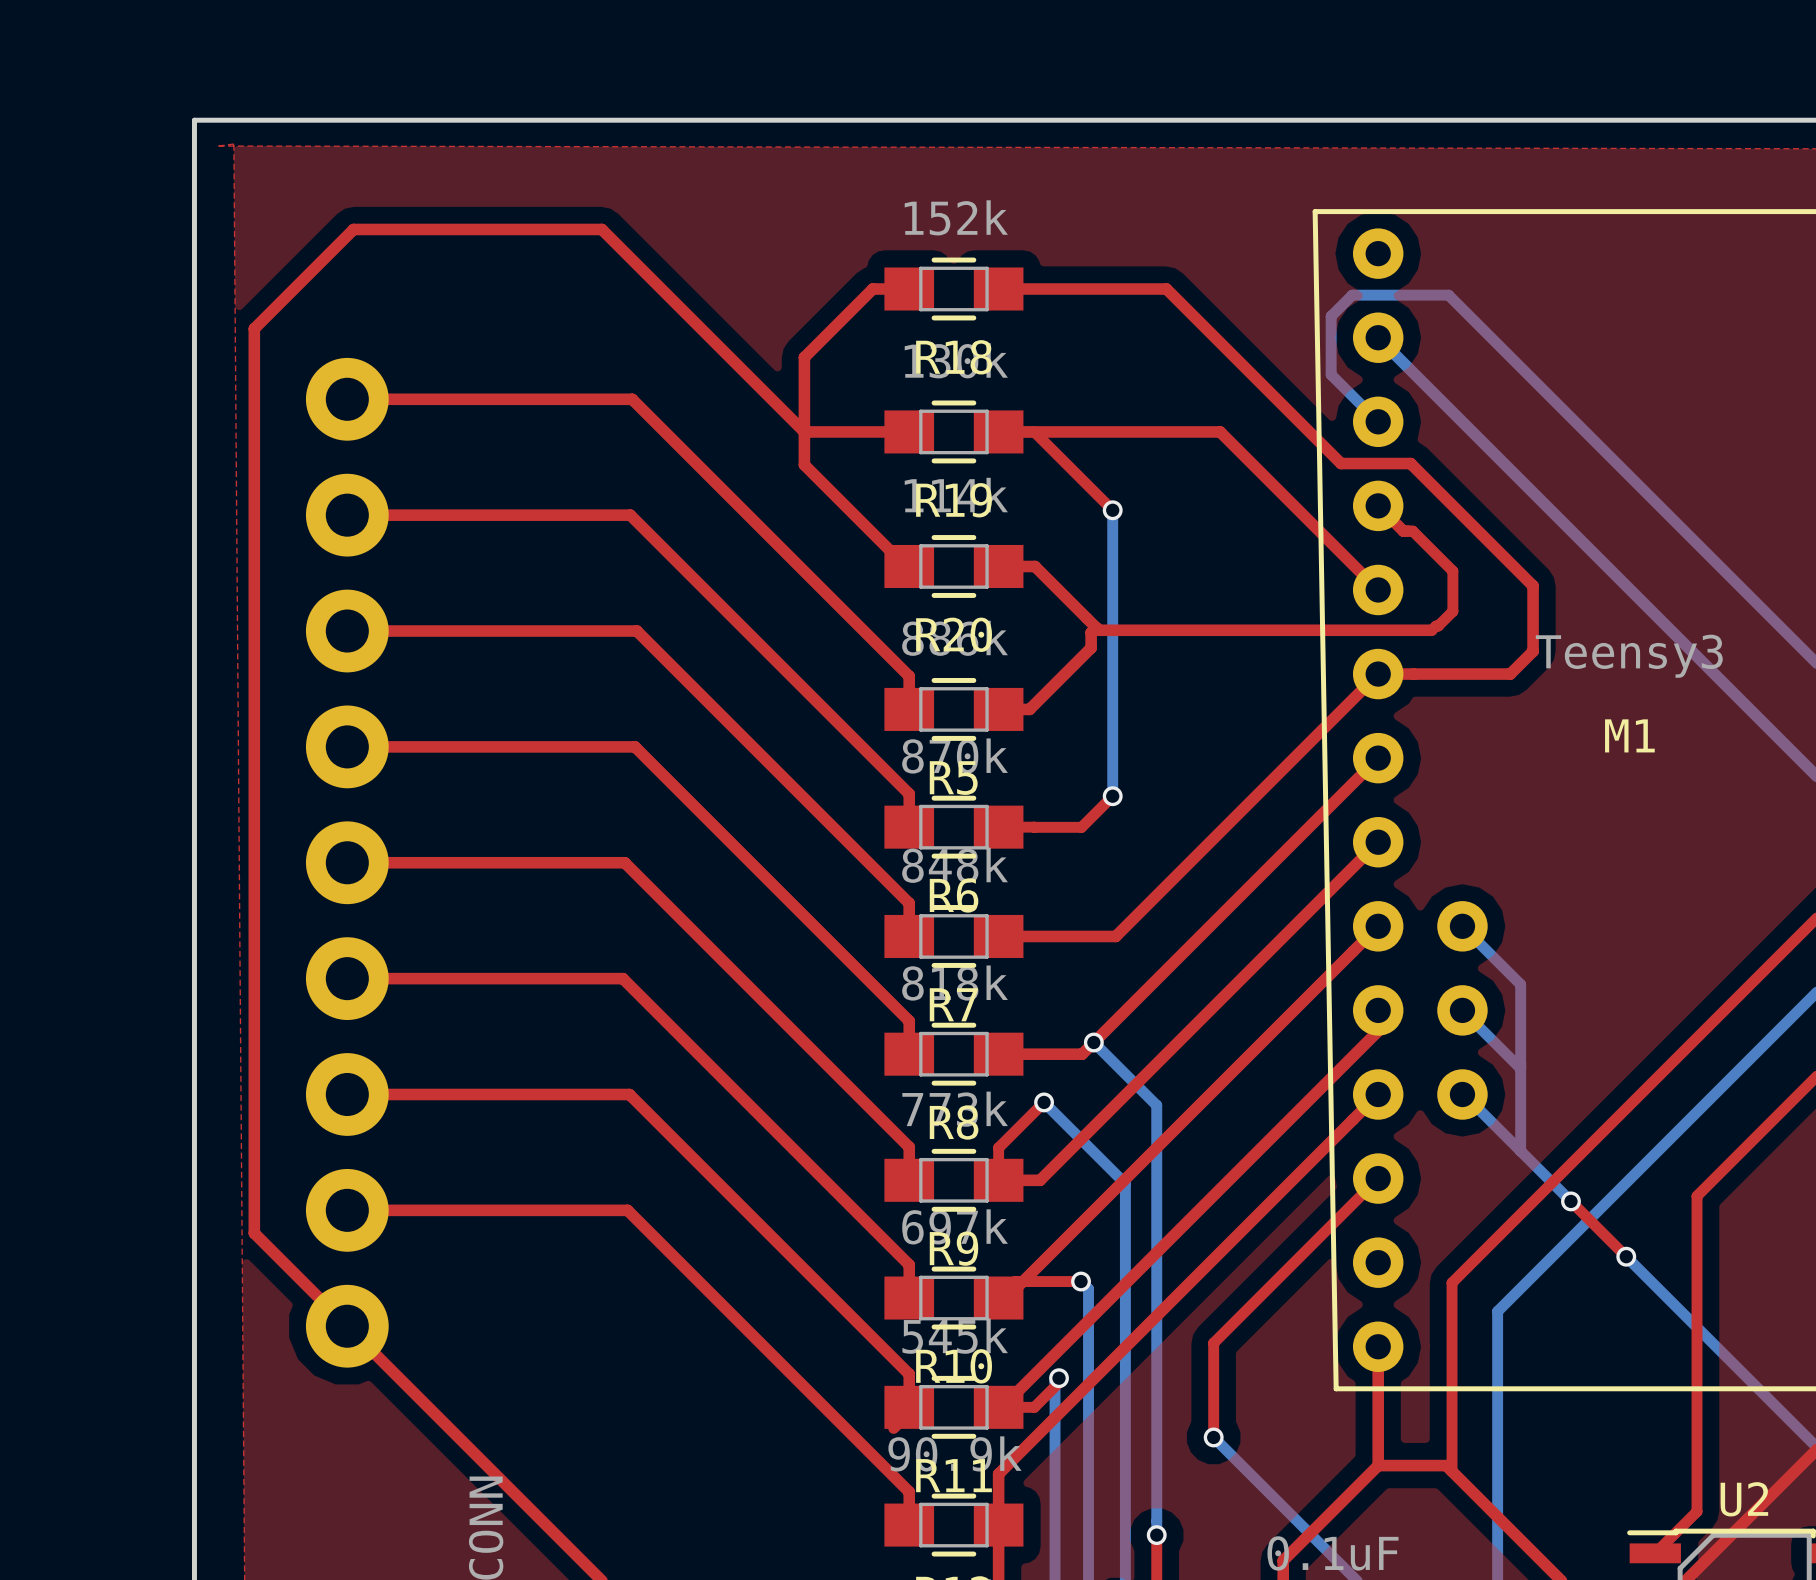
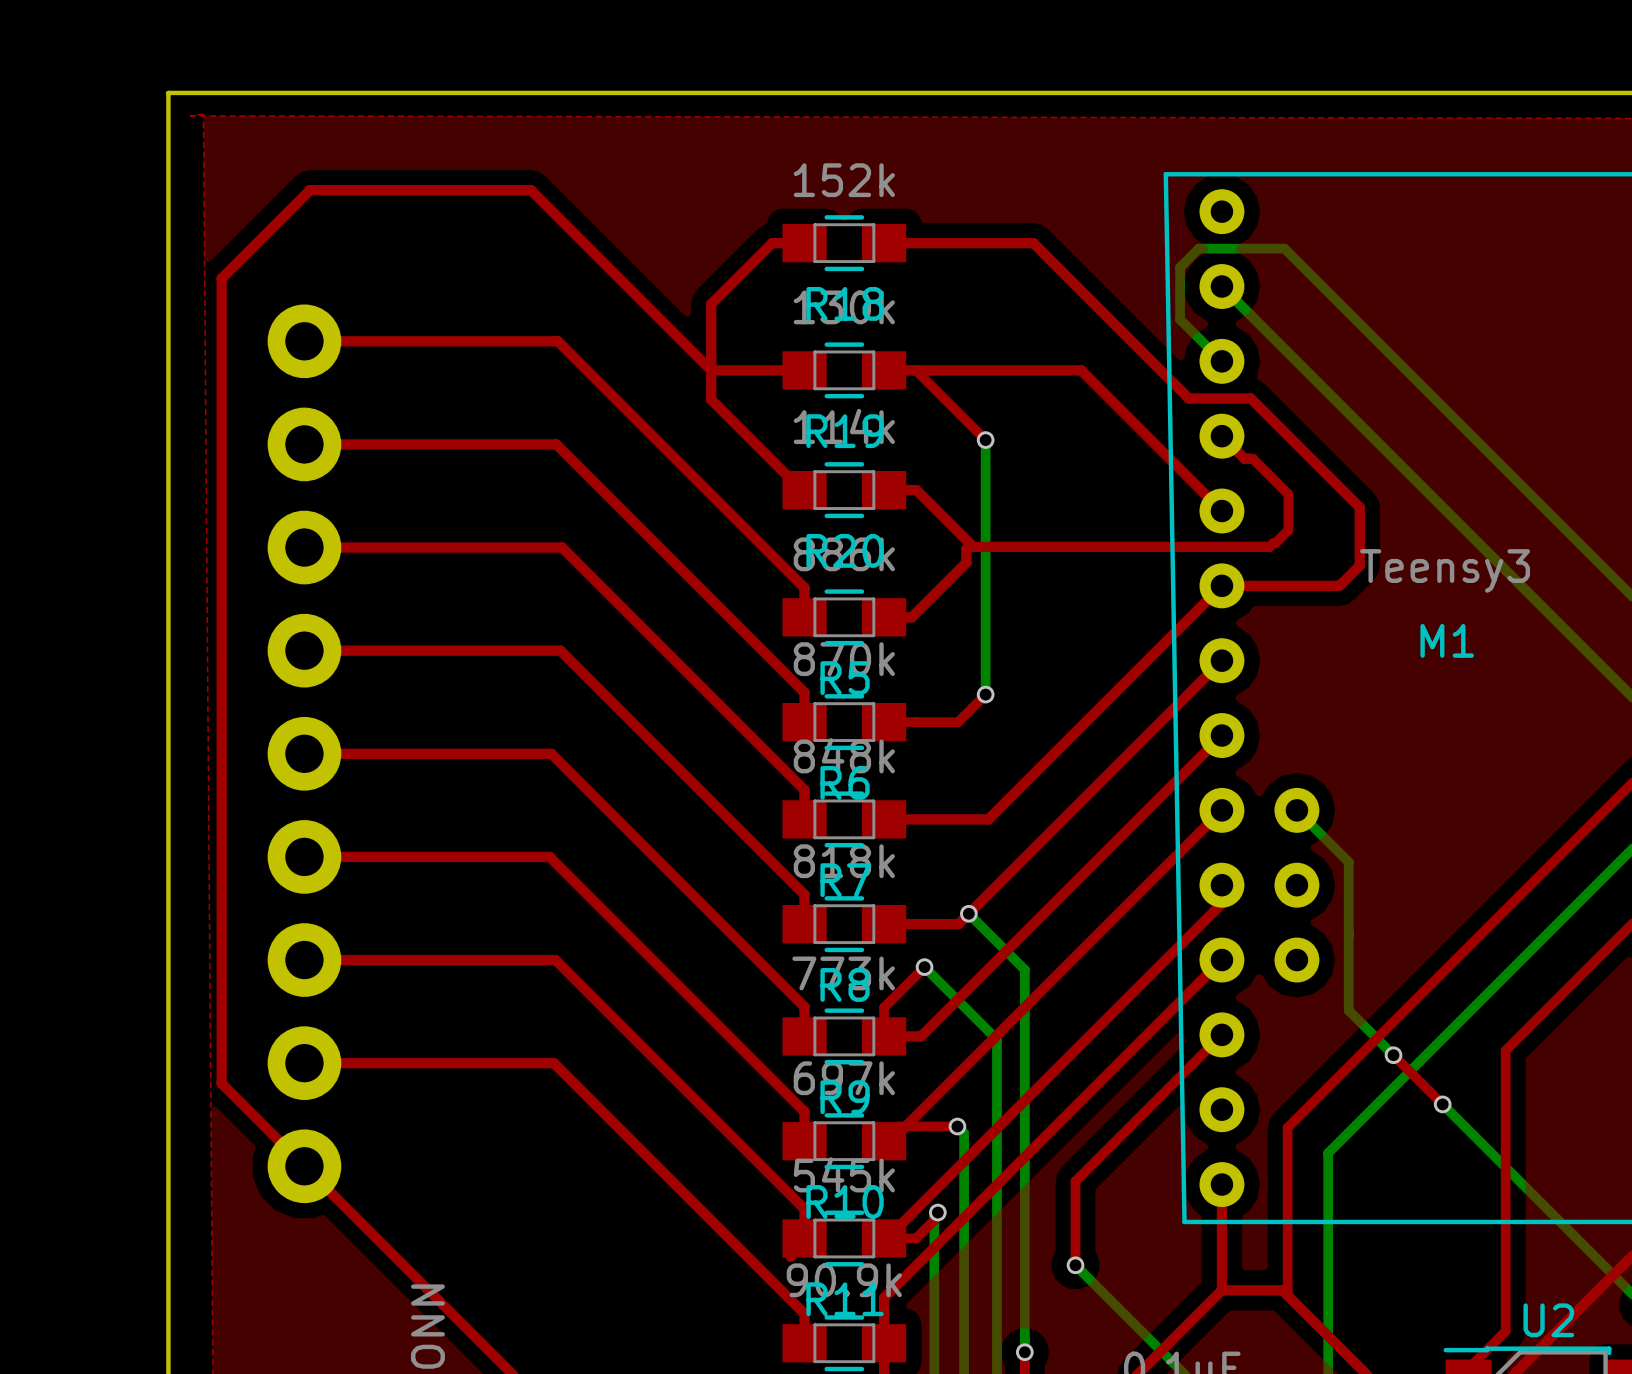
bottom track: (1462, 1010) (1520, 1068) -> none
bottom track: (1464, 1094) (1520, 1151) -> none

